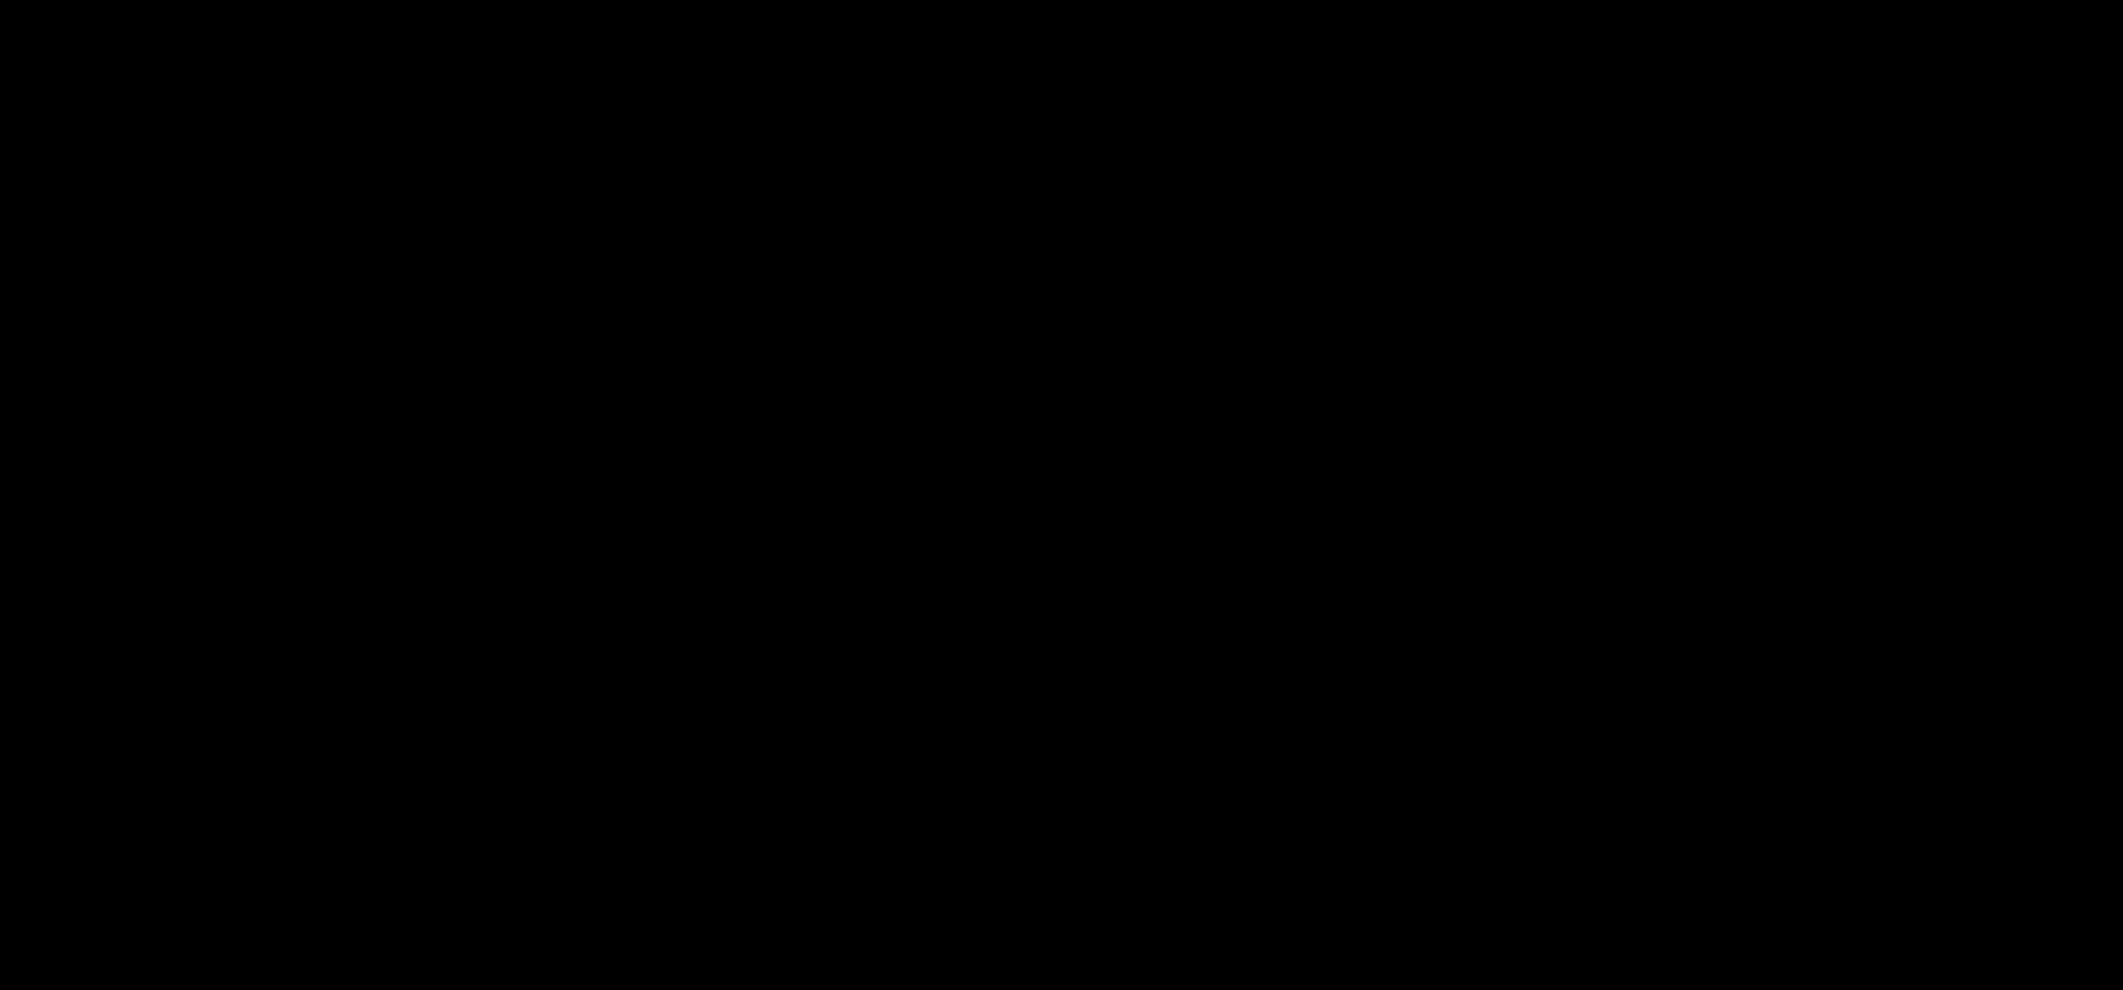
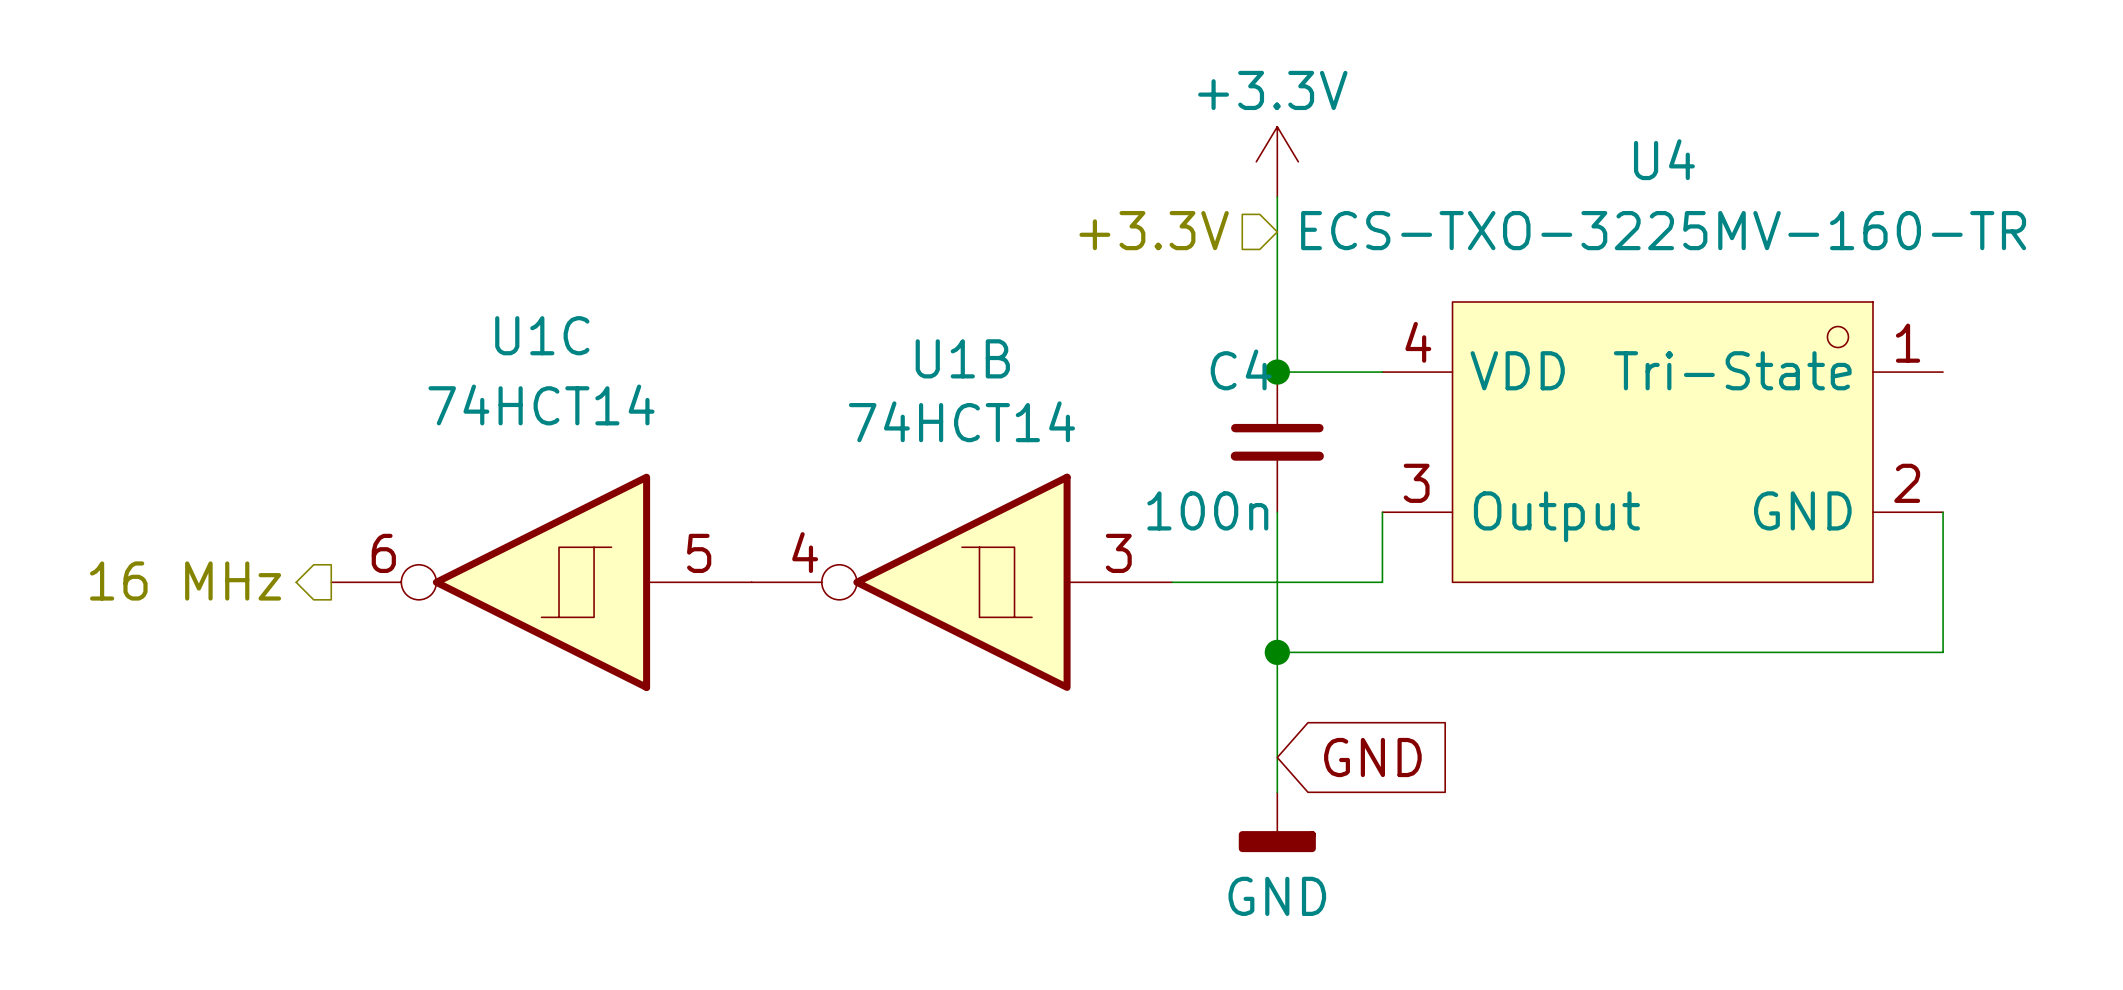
power symbol: none -> +3.3V (1277, 161)
wire: none -> (1277, 196) (1277, 372) (1382, 372)
hierarchical label: none -> +3.3V (1154, 230)
junction: none -> (1277, 372)
C4: none -> 100n (1277, 442)
U4: none -> ECS-TXO-3225MV-160-TR (1662, 442)
wire: none -> (1277, 512) (1277, 792)
wire: none -> (1382, 512) (1382, 582) (1172, 582)
wire: none -> (1943, 512) (1943, 652) (1277, 652)
hierarchical label: none -> 16 MHz (185, 580)
U1C: none -> 74HCT14 (541, 582)
U1B: none -> 74HCT14 (961, 582)
junction: none -> (1277, 652)
global label: none -> GND (1372, 757)
power symbol: none -> GND (1277, 822)

